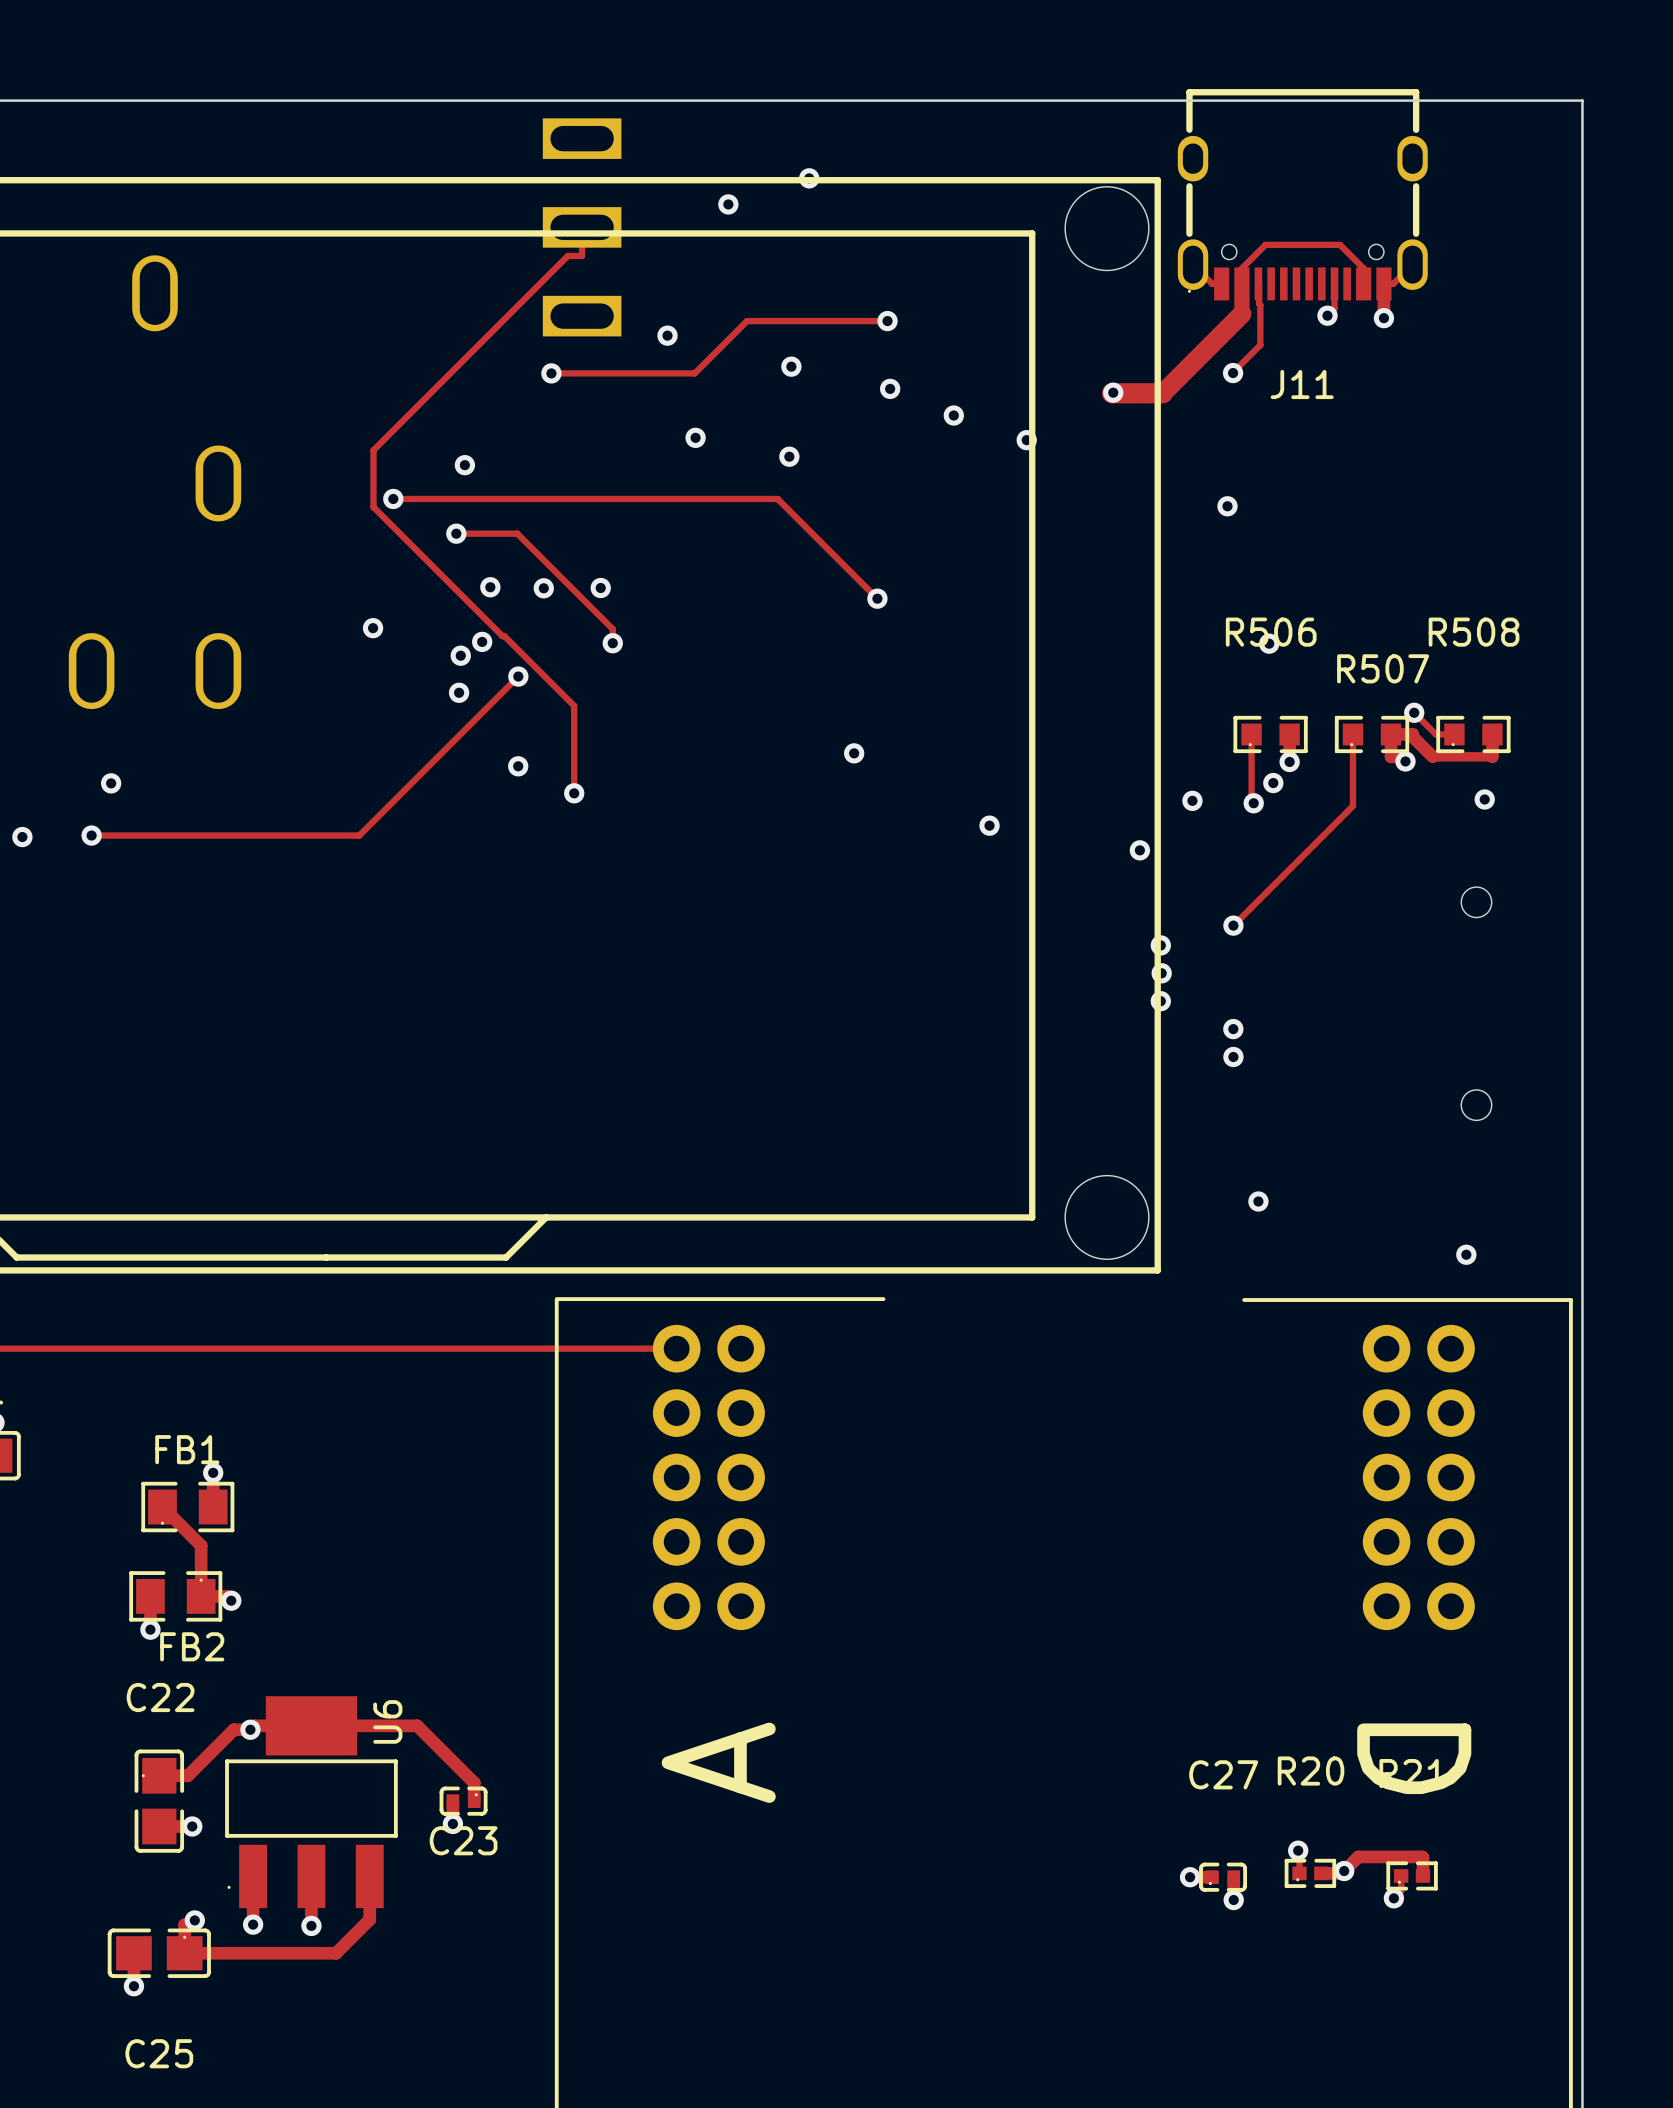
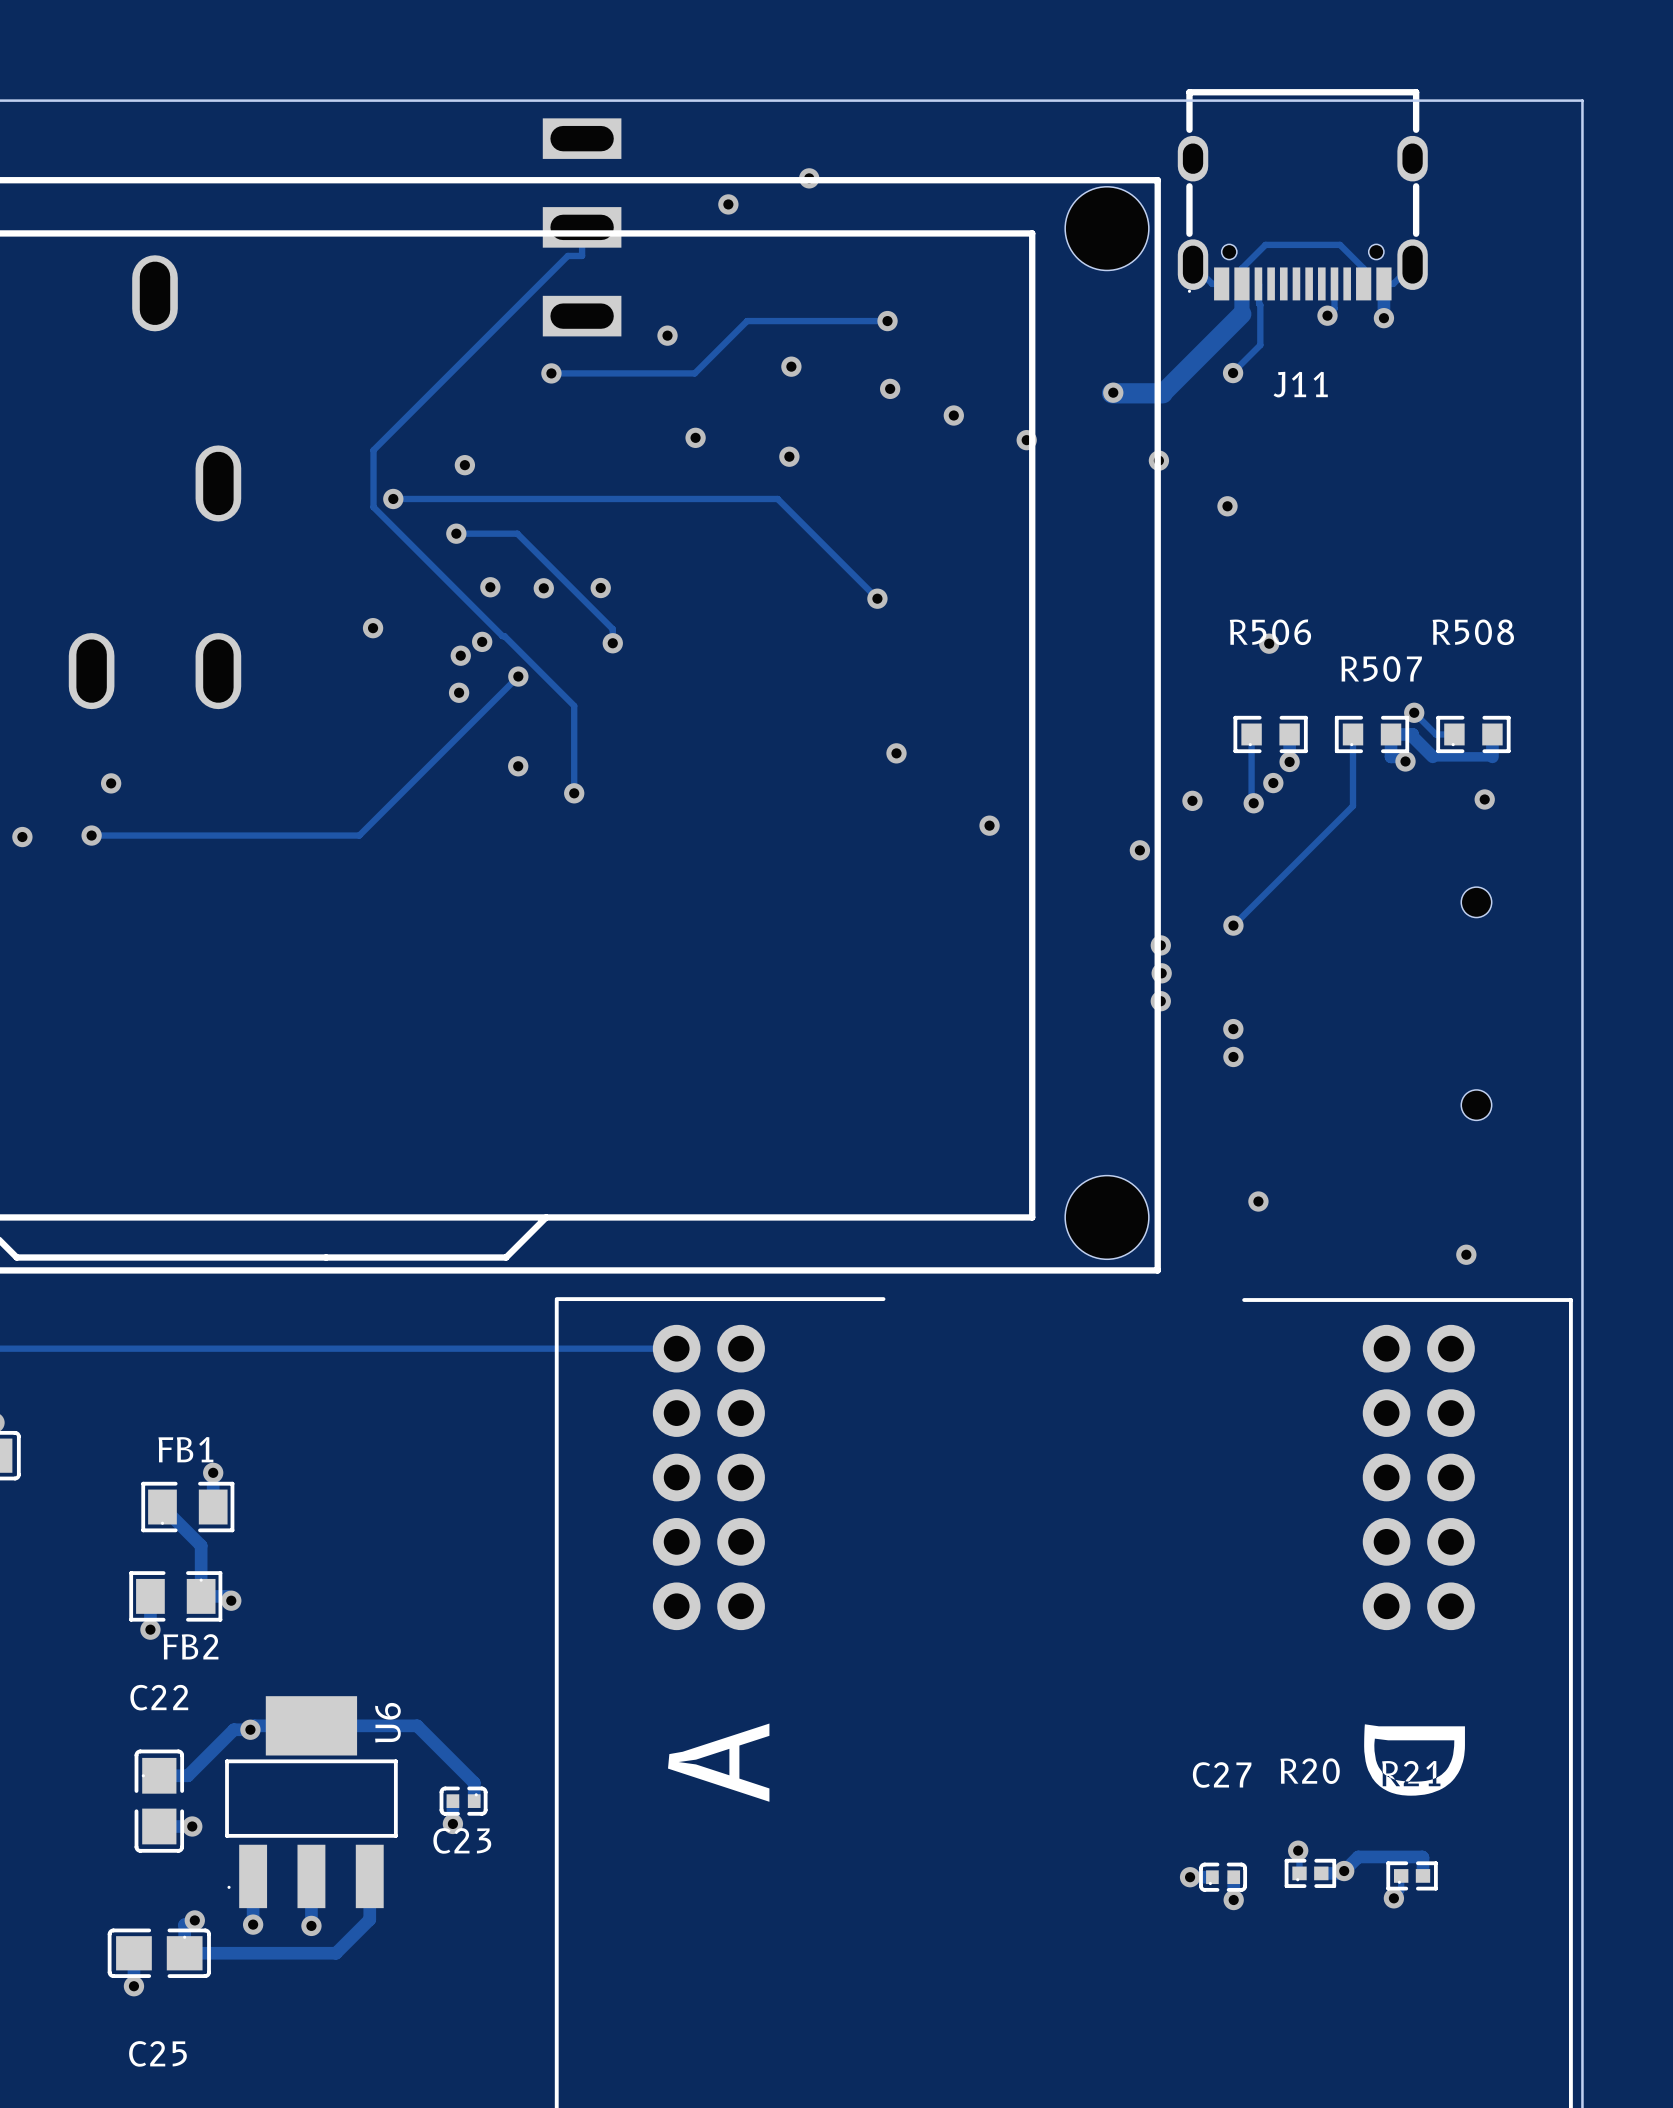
via: none -> (1158, 460)
via position: (854, 753) -> (896, 753)

